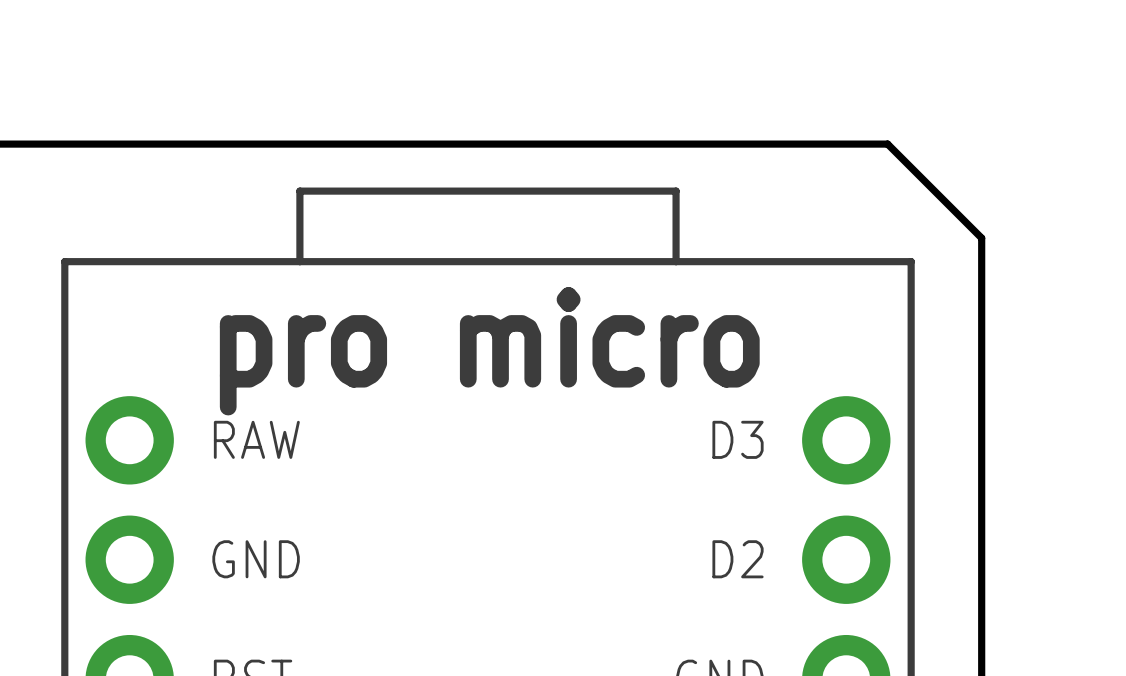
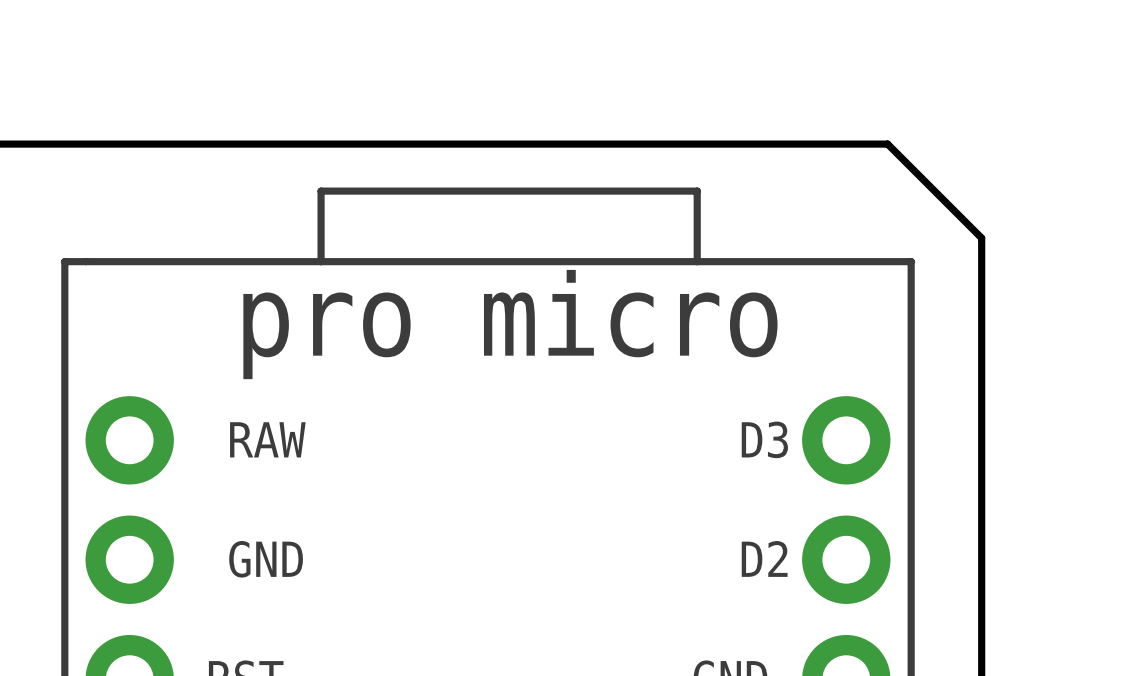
line: (321, 191) (299, 191) (299, 261) -> (321, 191) (321, 261)
line: (676, 191) (676, 261) -> (676, 191) (697, 191) (697, 261)
text position: pro micro (489, 351) -> pro micro (510, 324)
text position: RAW (256, 439) -> RAW (267, 439)
text position: D3 (738, 439) -> D3 (764, 439)
text position: GND (256, 559) -> GND (266, 559)
text position: D2 (738, 559) -> D2 (764, 558)

